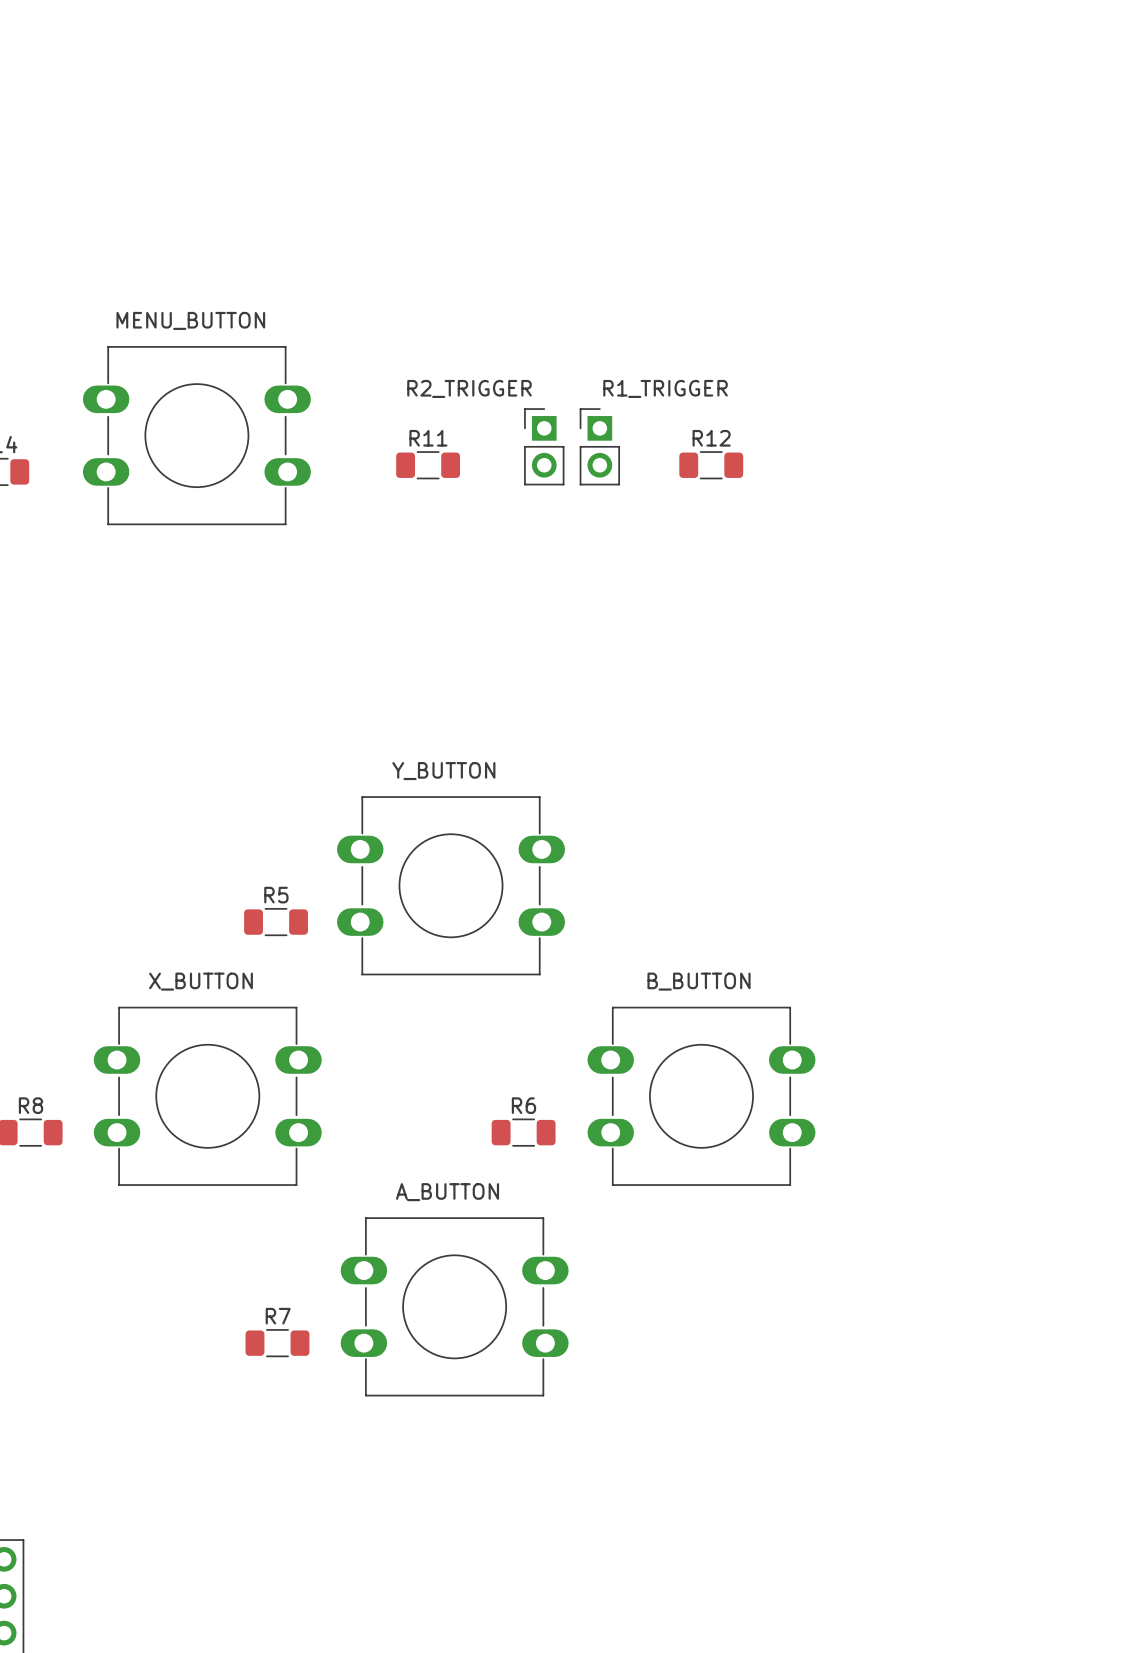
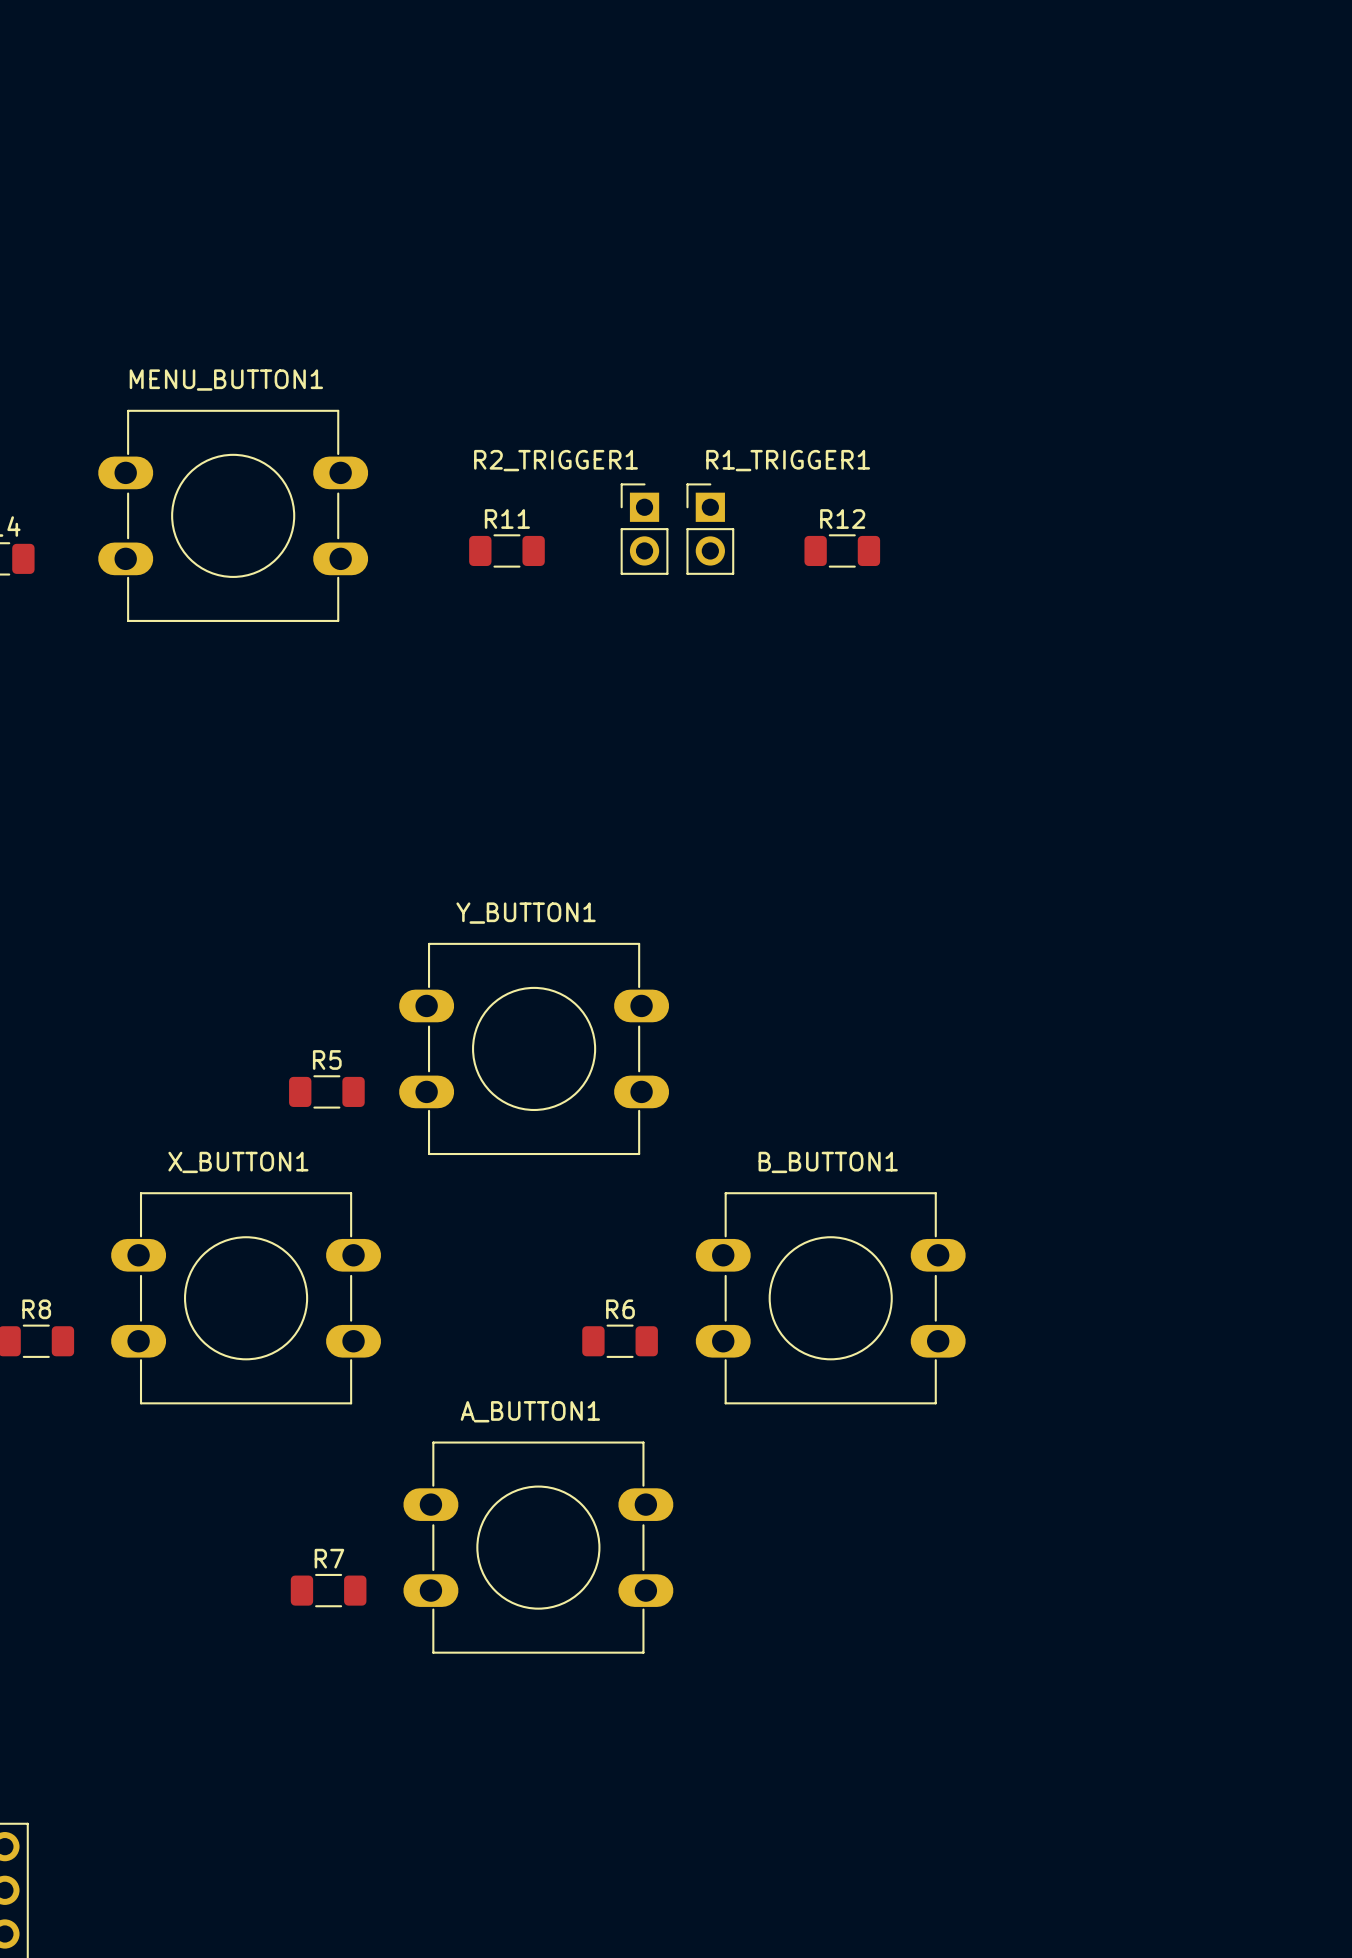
MENU_BUTTON name: MENU_BUTTON (190, 320) -> MENU_BUTTON1 (226, 380)
R2_TRIGGER name: R2_TRIGGER (469, 388) -> R2_TRIGGER1 (556, 460)
R1_TRIGGER name: R1_TRIGGER (665, 388) -> R1_TRIGGER1 (788, 460)
Y_BUTTON name: Y_BUTTON (443, 771) -> Y_BUTTON1 (526, 913)
X_BUTTON name: X_BUTTON (201, 981) -> X_BUTTON1 (238, 1162)
B_BUTTON name: B_BUTTON (699, 981) -> B_BUTTON1 (828, 1162)
A_BUTTON name: A_BUTTON (447, 1192) -> A_BUTTON1 (530, 1411)

